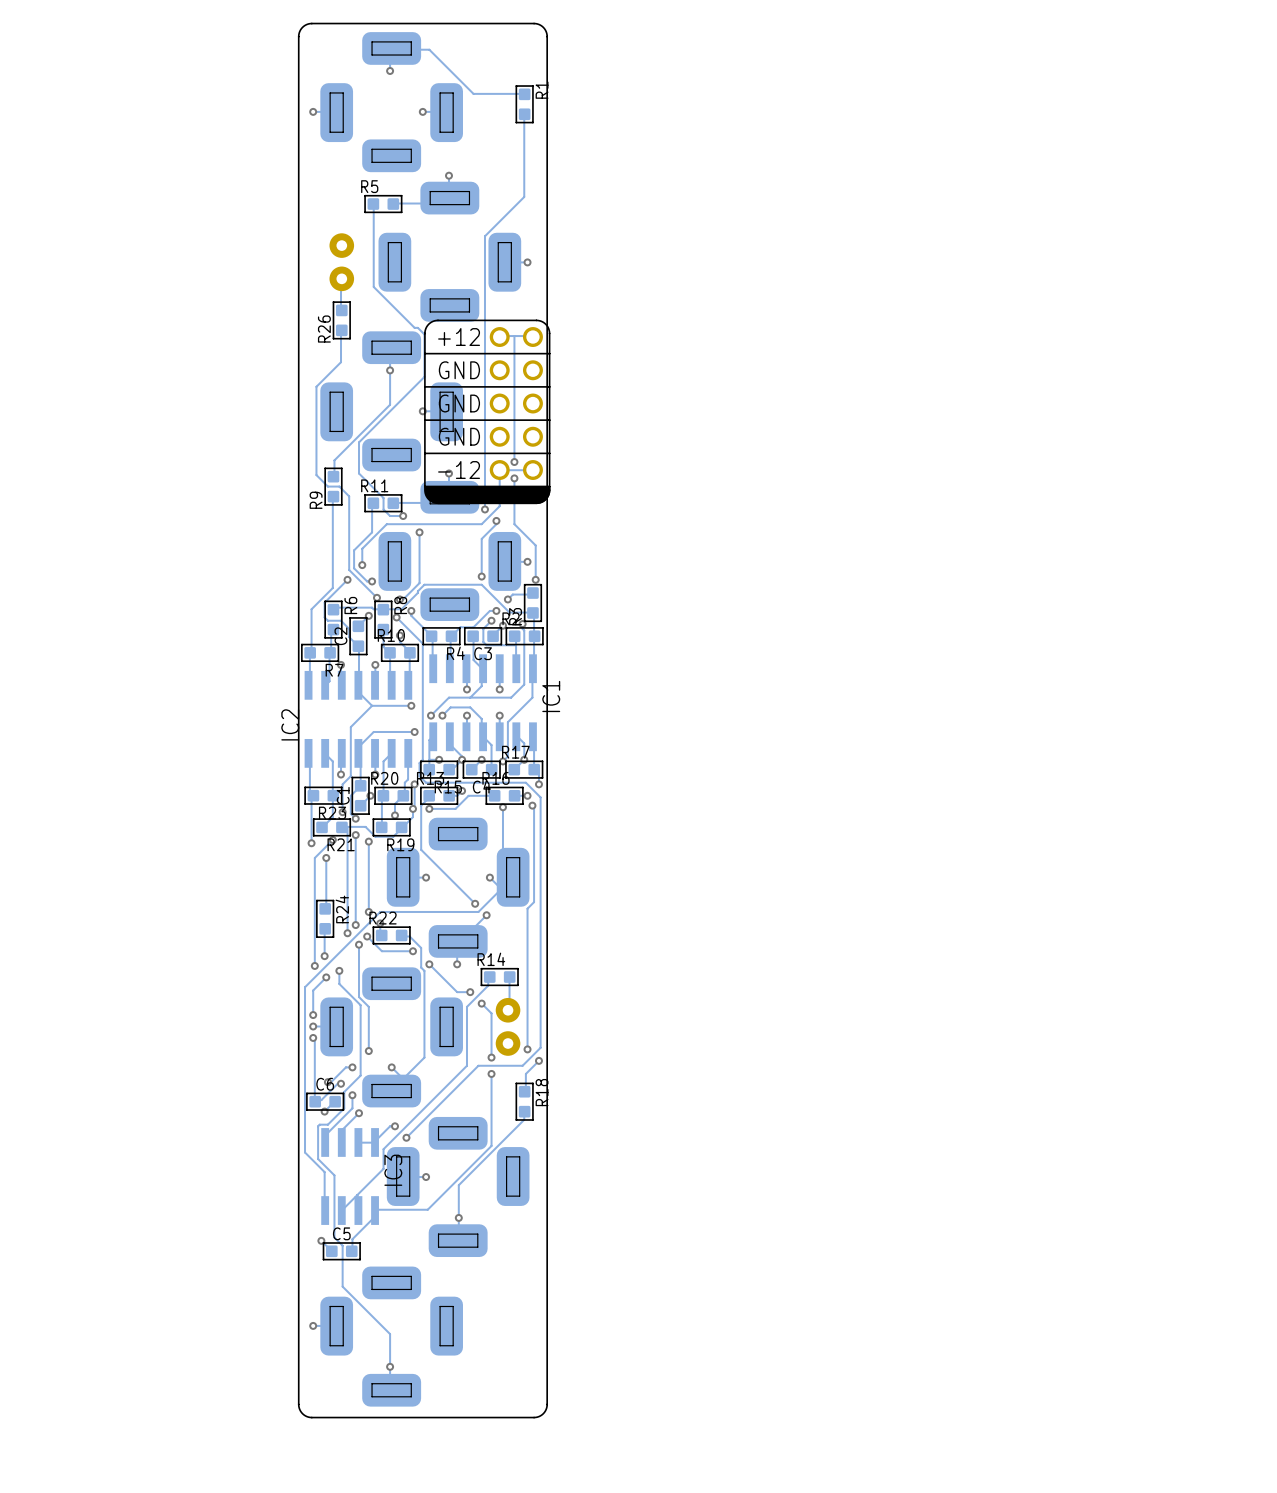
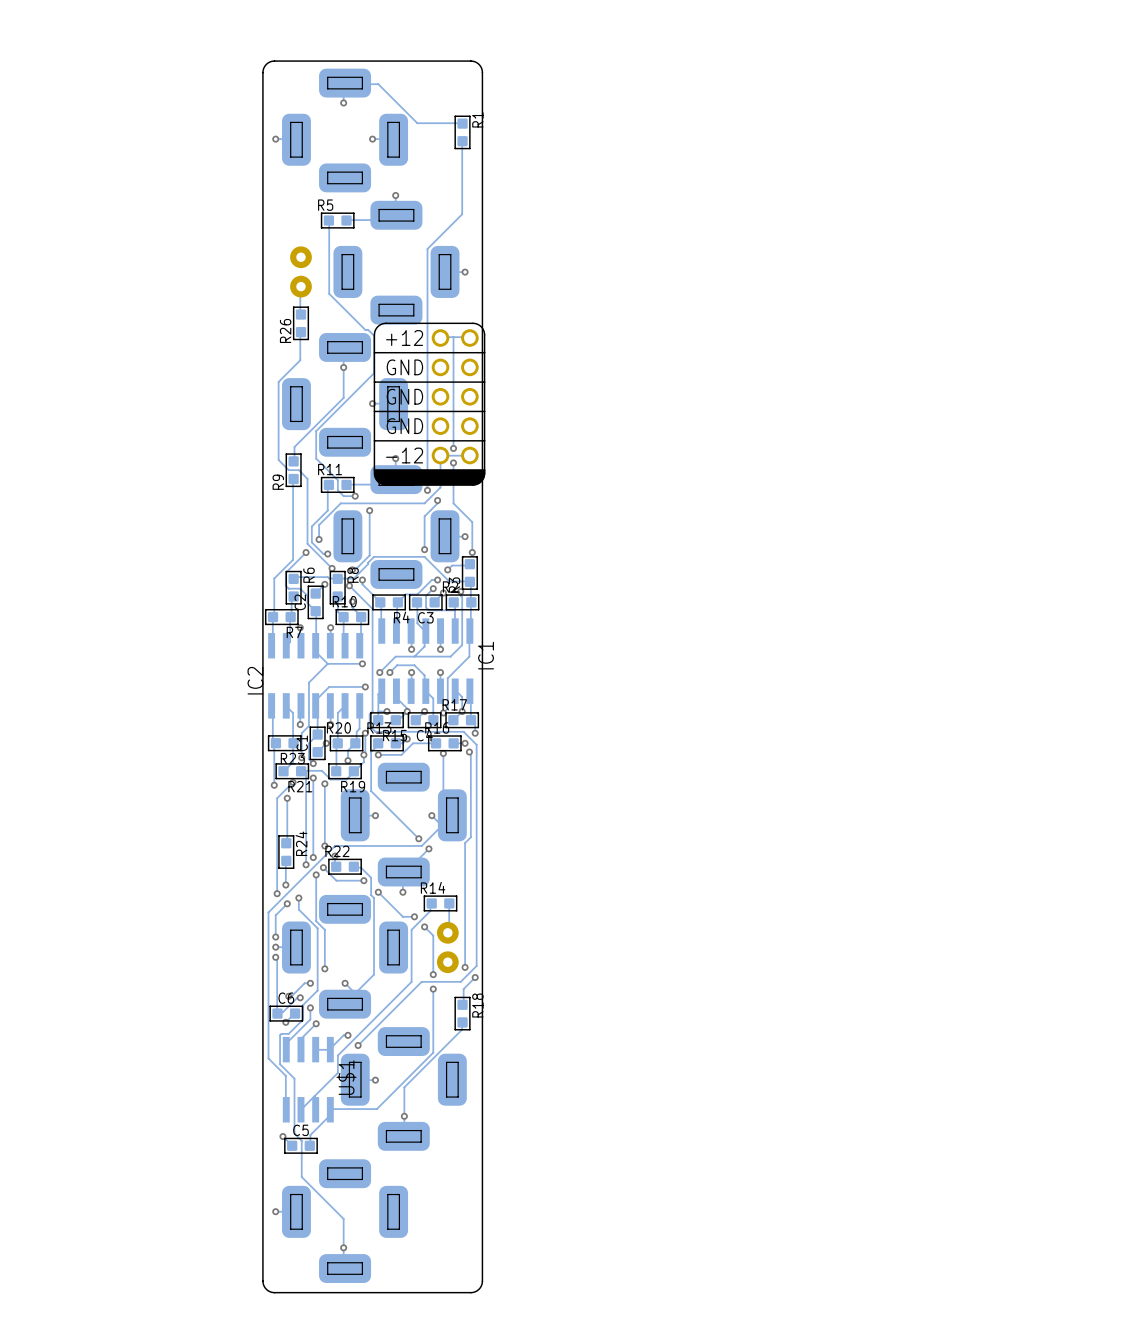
IC3 name: IC3 (393, 1170) -> U$1 (346, 1077)

